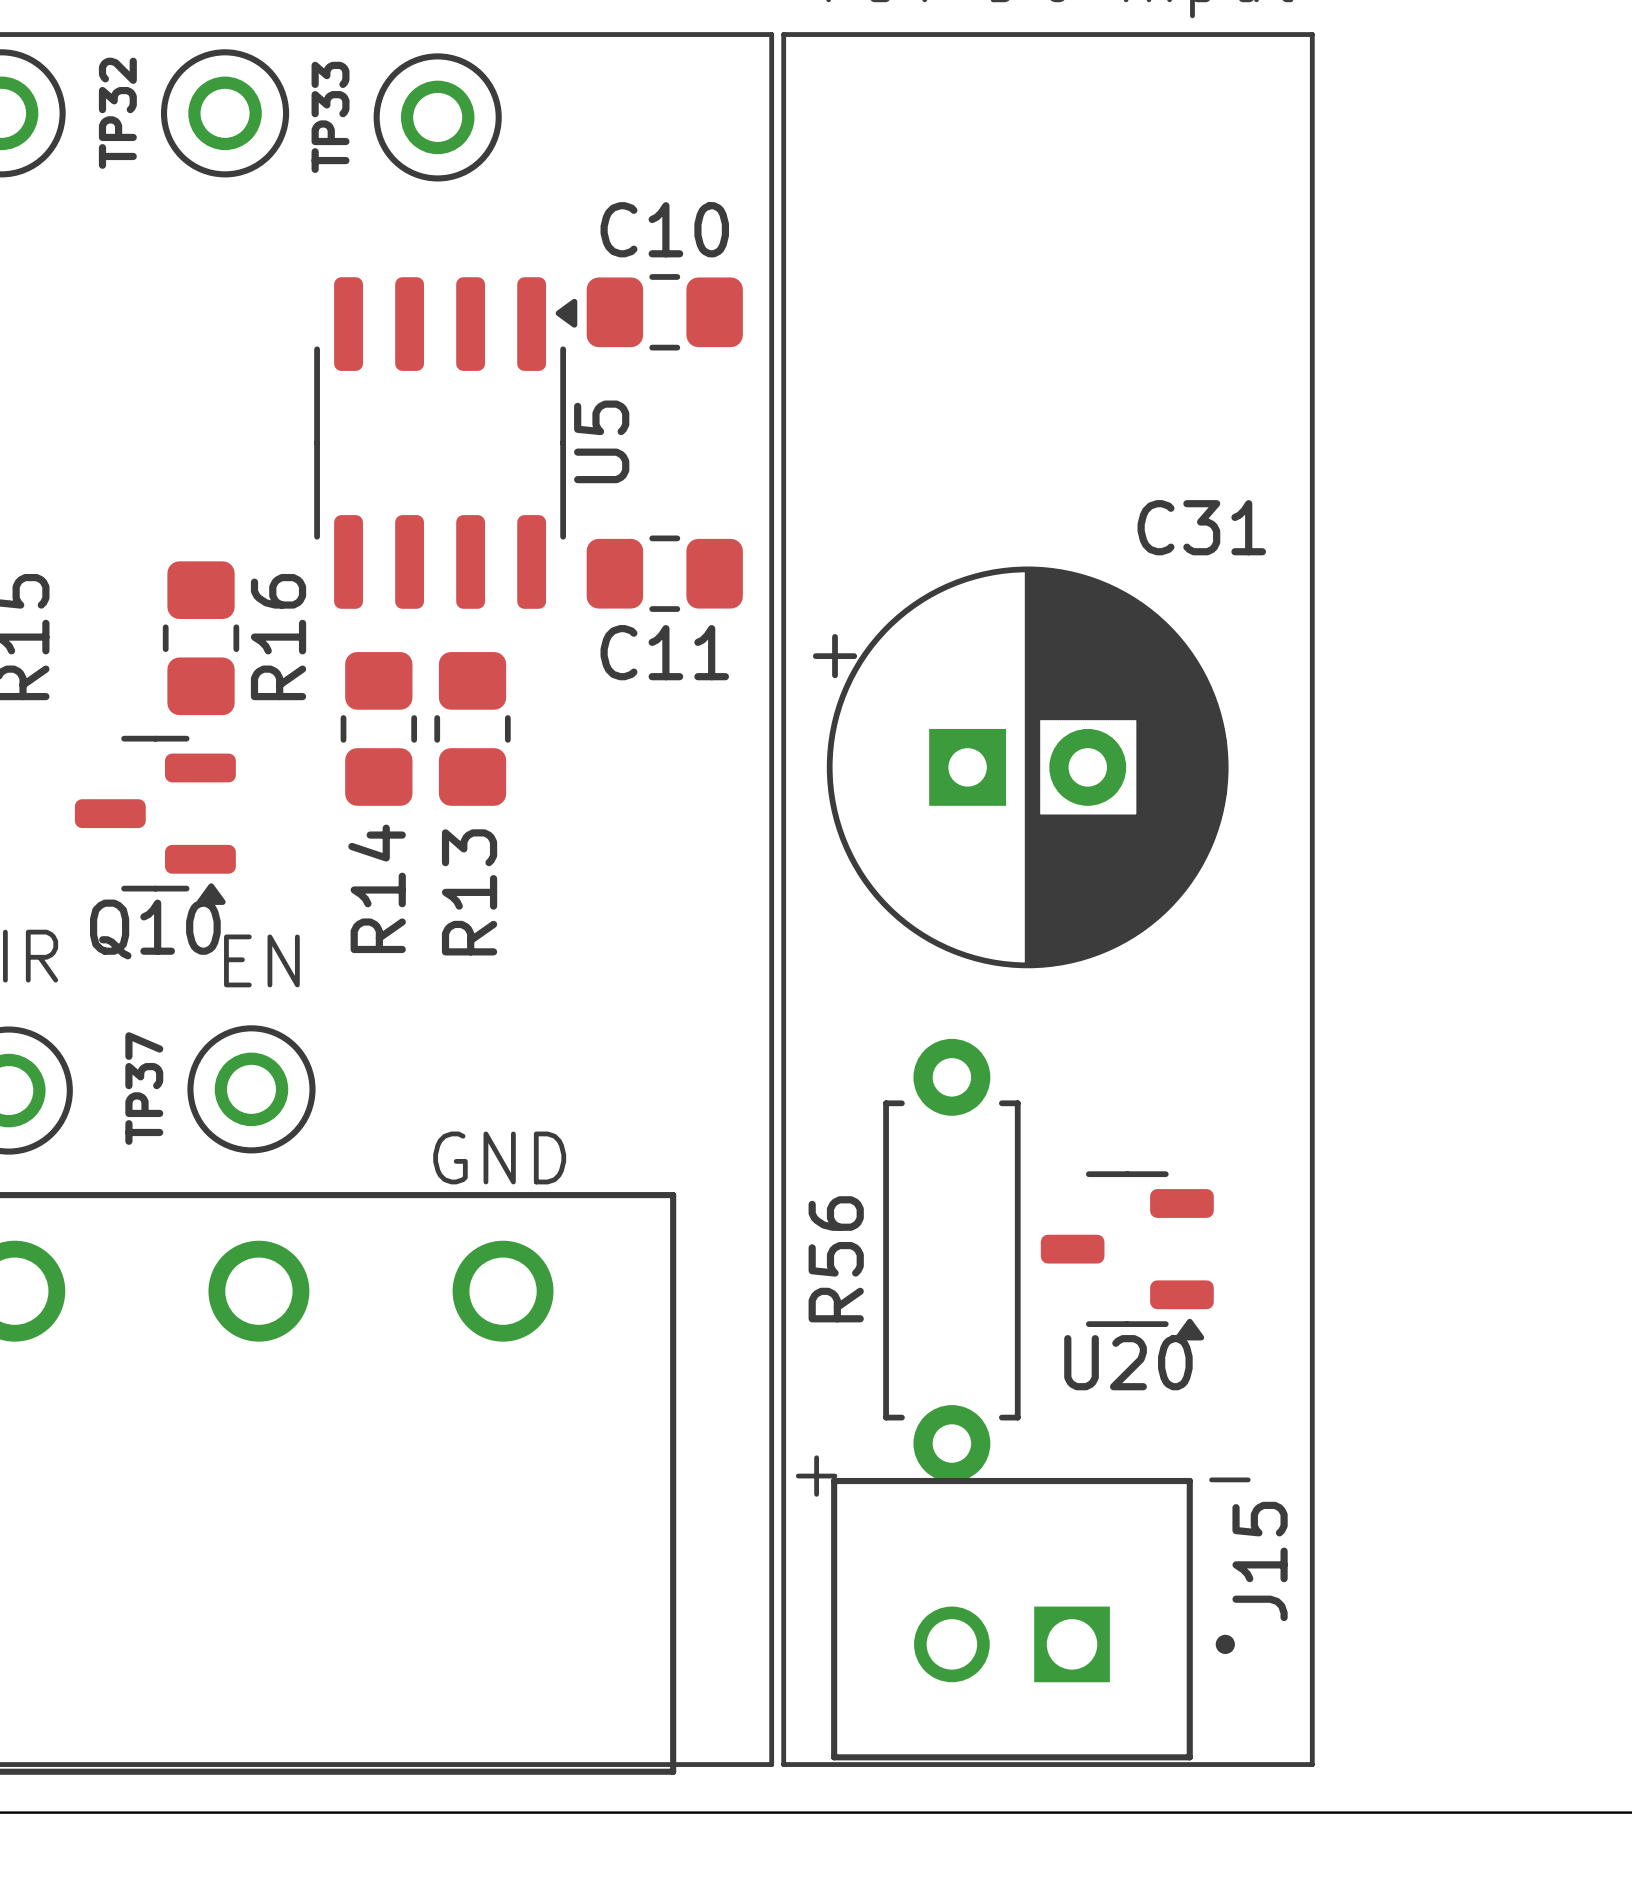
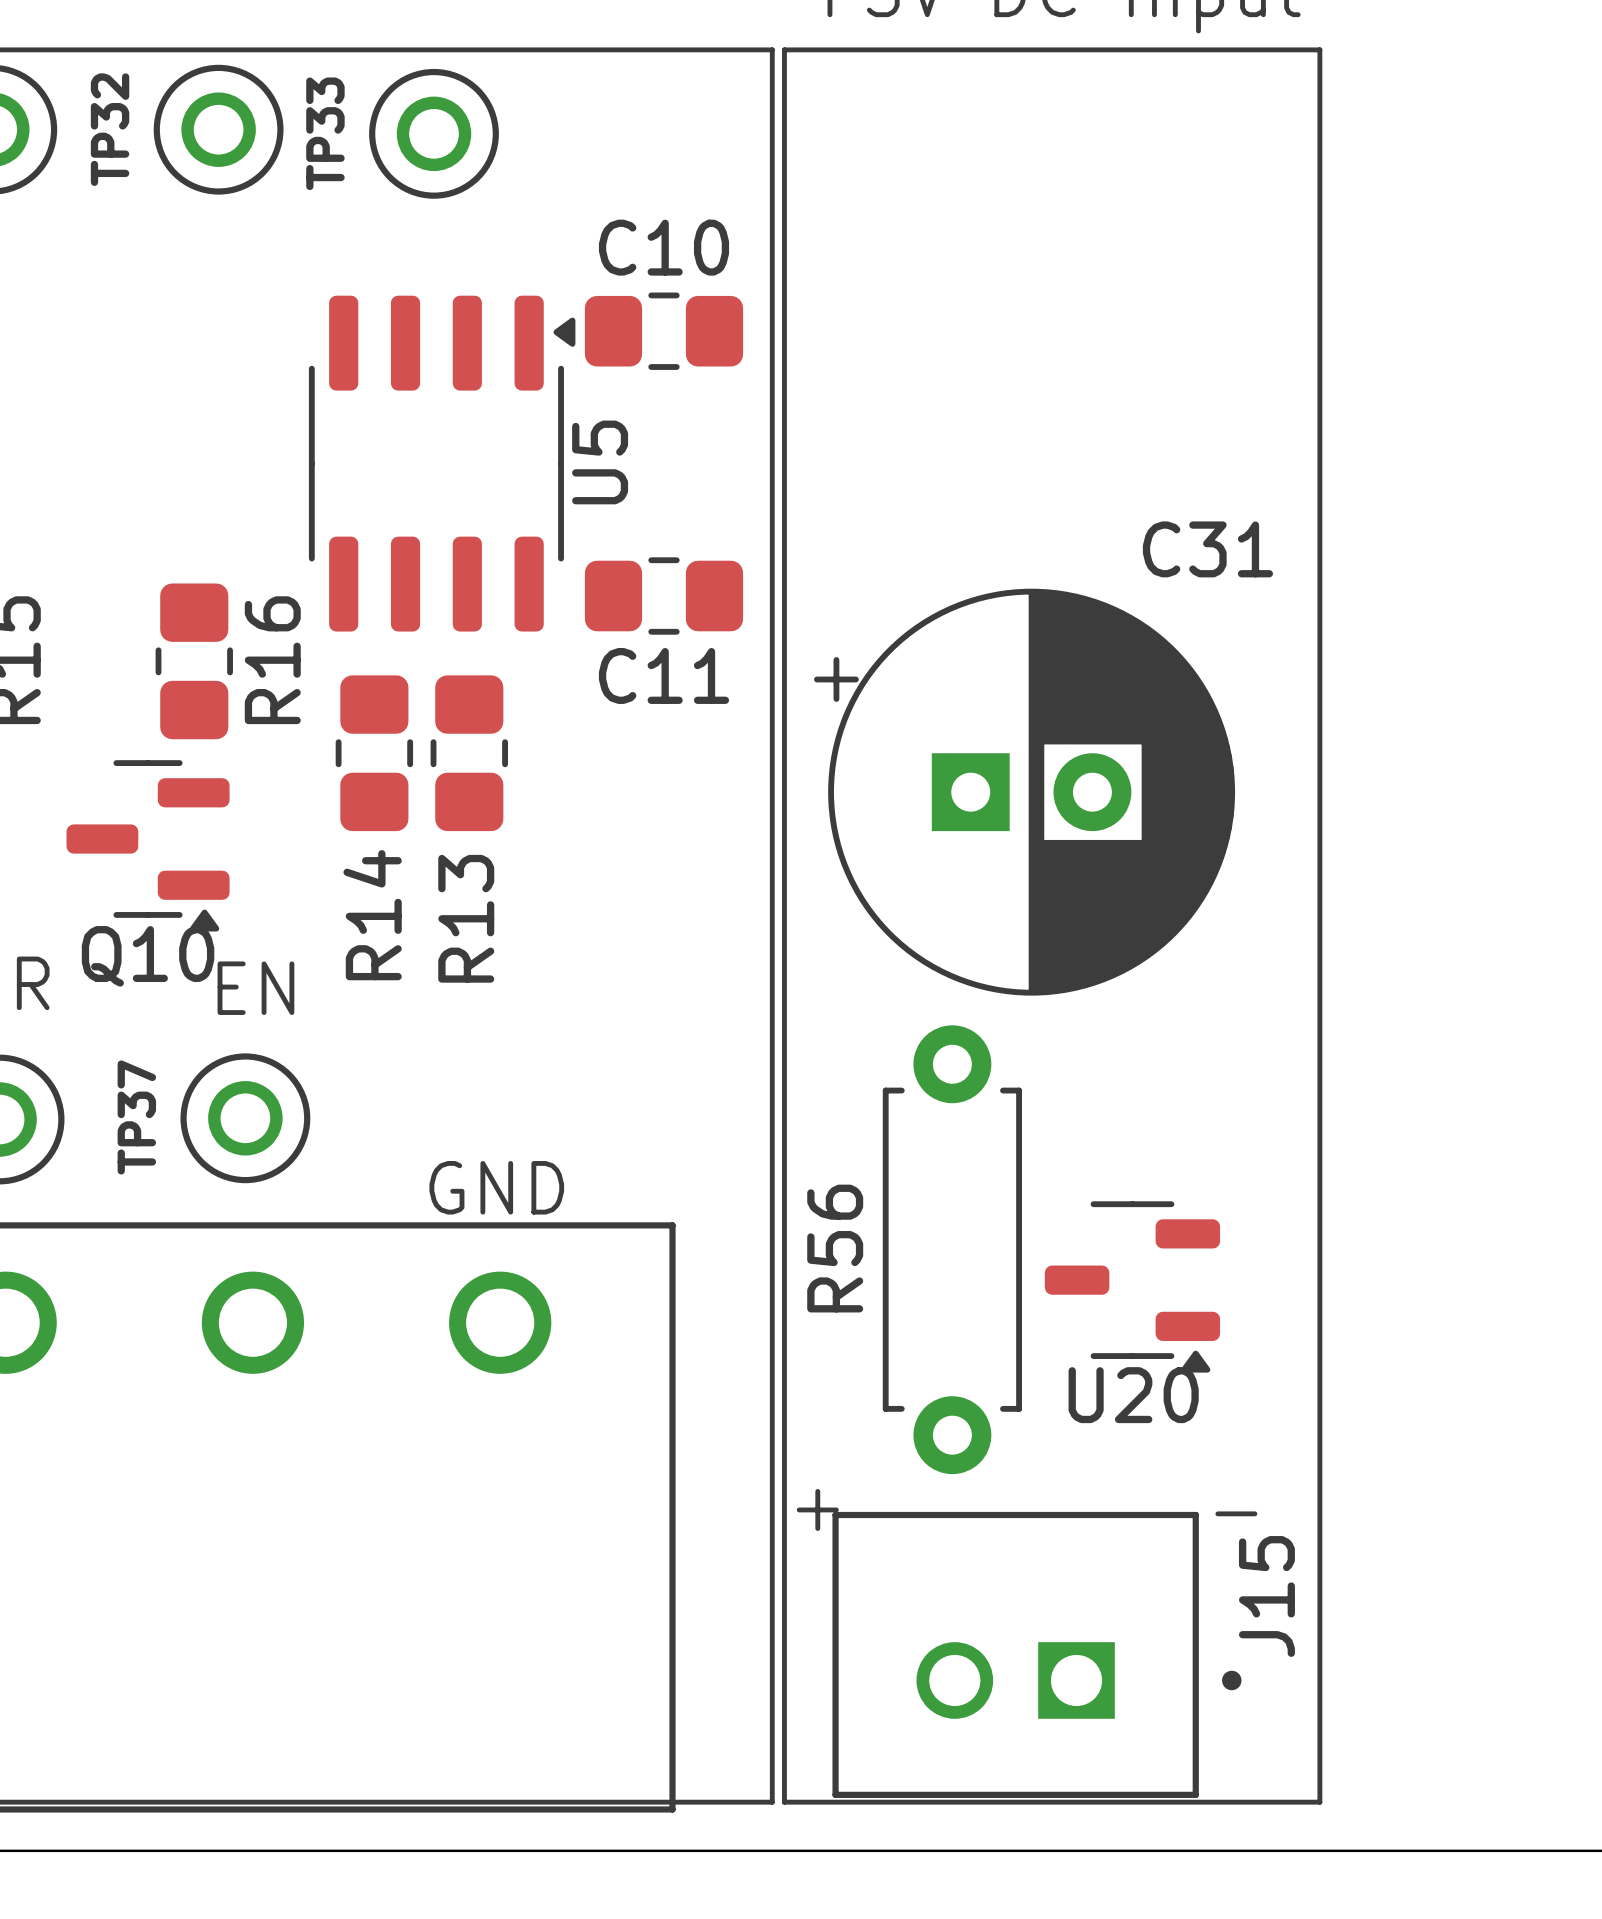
R56 position: (951, 1260) -> (952, 1249)

